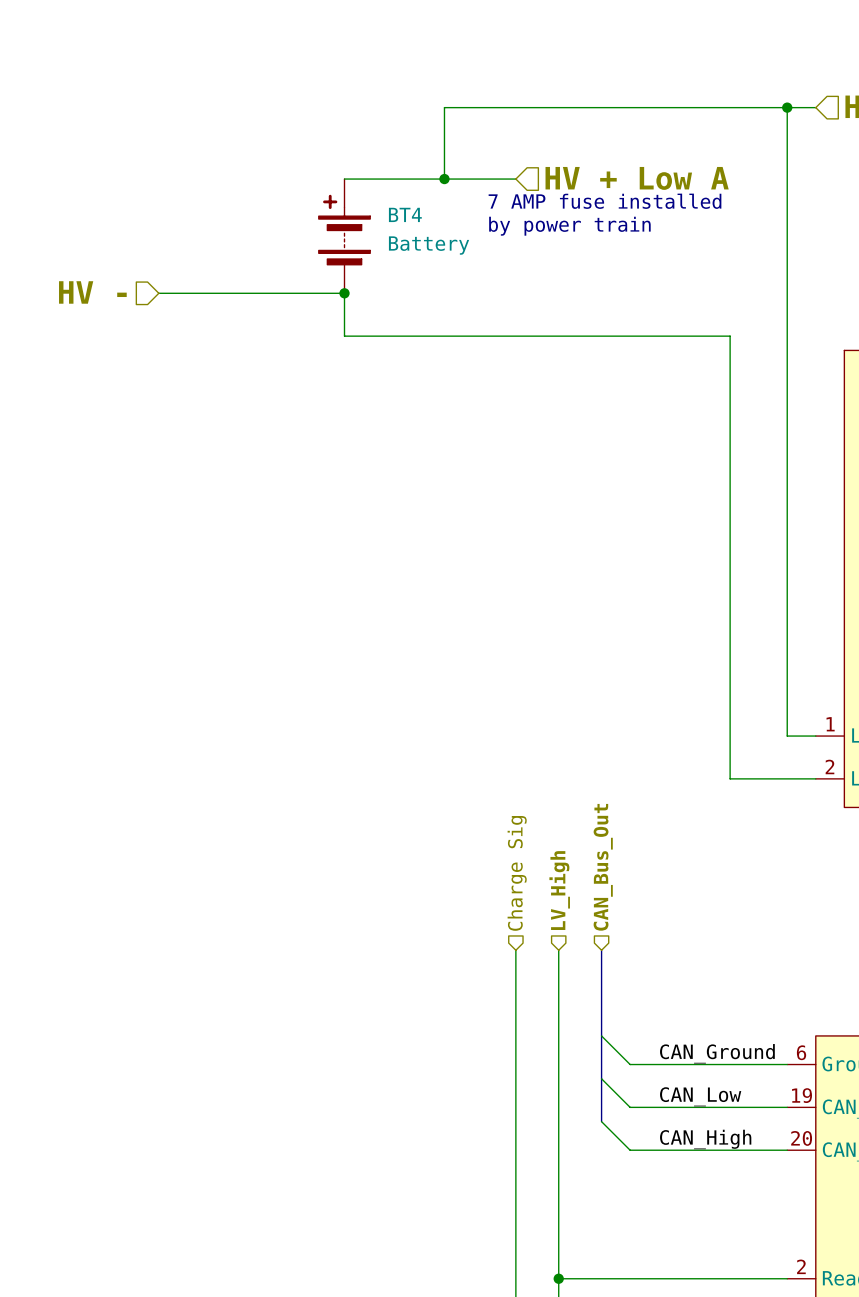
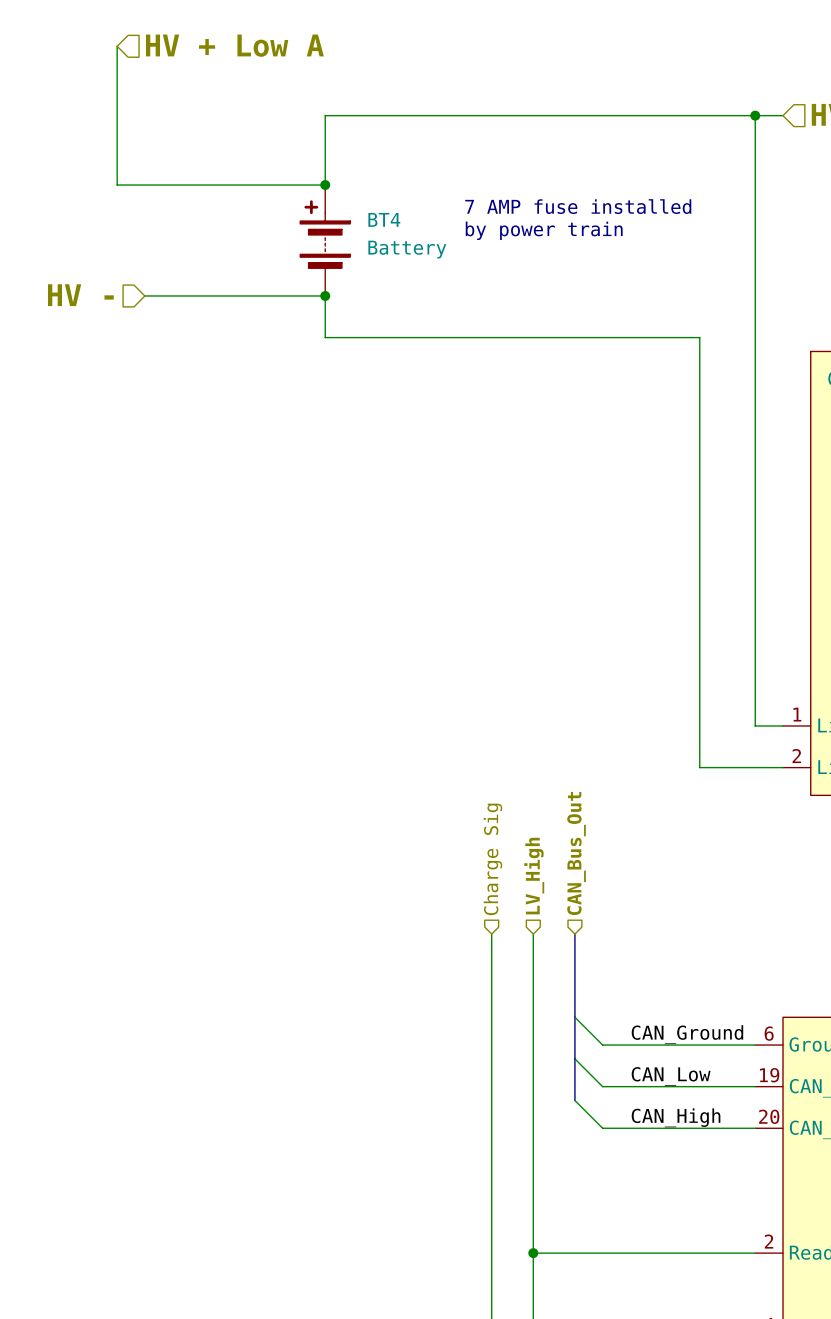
hierarchical label: none -> HV + Low A (234, 45)
wire: (444, 107) (444, 179) -> (422, 115) (325, 115) (325, 185) (117, 185) (117, 46)
hierarchical label: HV + Low A (637, 178) -> none
wire: (344, 179) (515, 179) -> none
junction: none -> (325, 185)
junction: (444, 179) -> none

